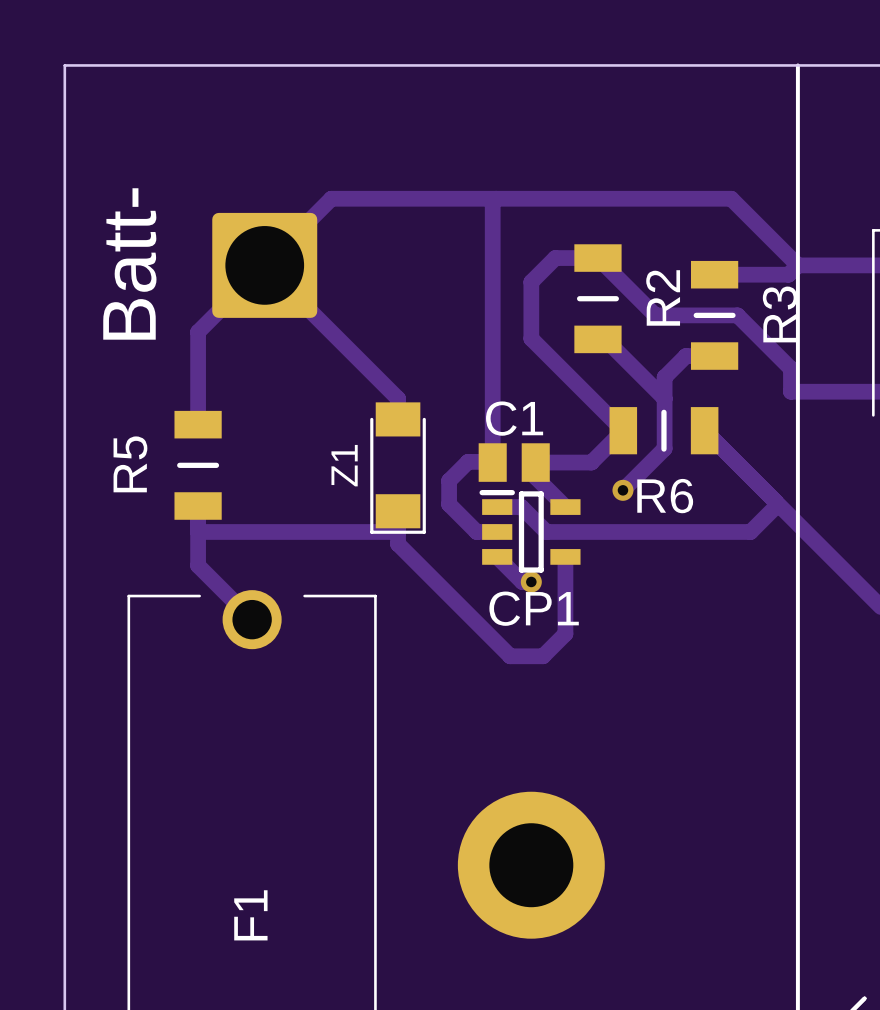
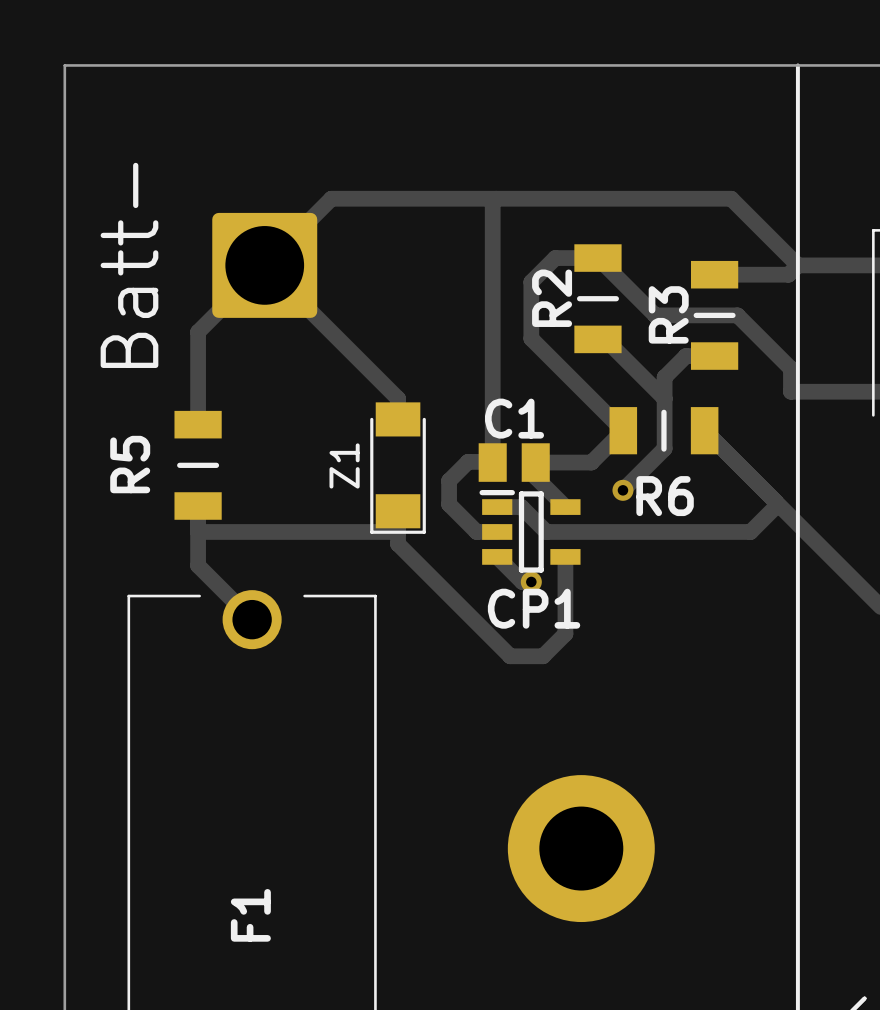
R2 name position: R2 (663, 297) -> R2 (552, 298)
R3 name position: R3 (779, 314) -> R3 (668, 314)
part position: (531, 865) -> (581, 848)

